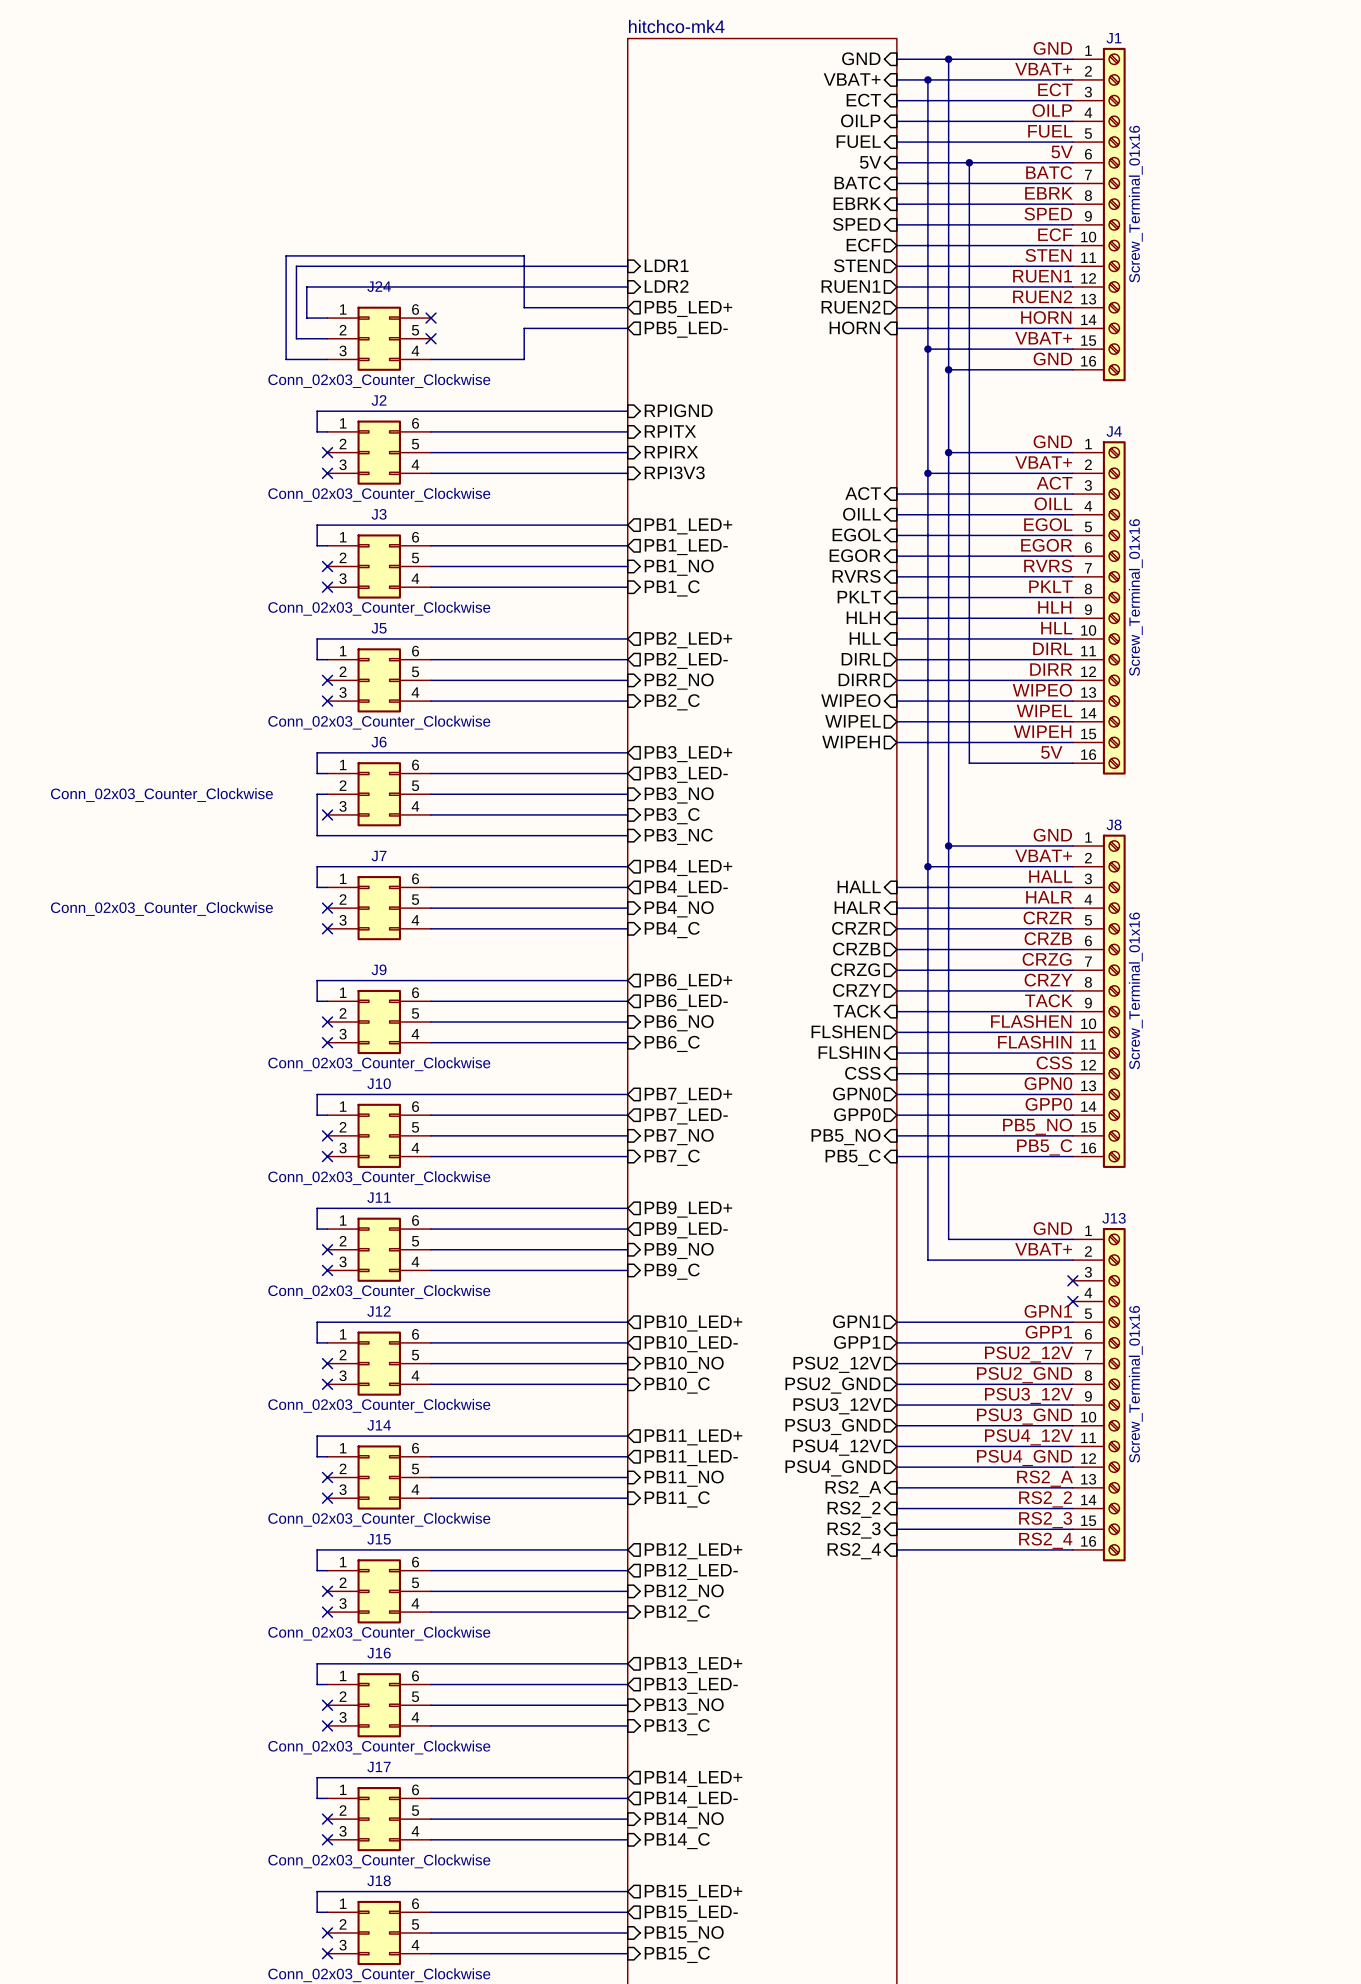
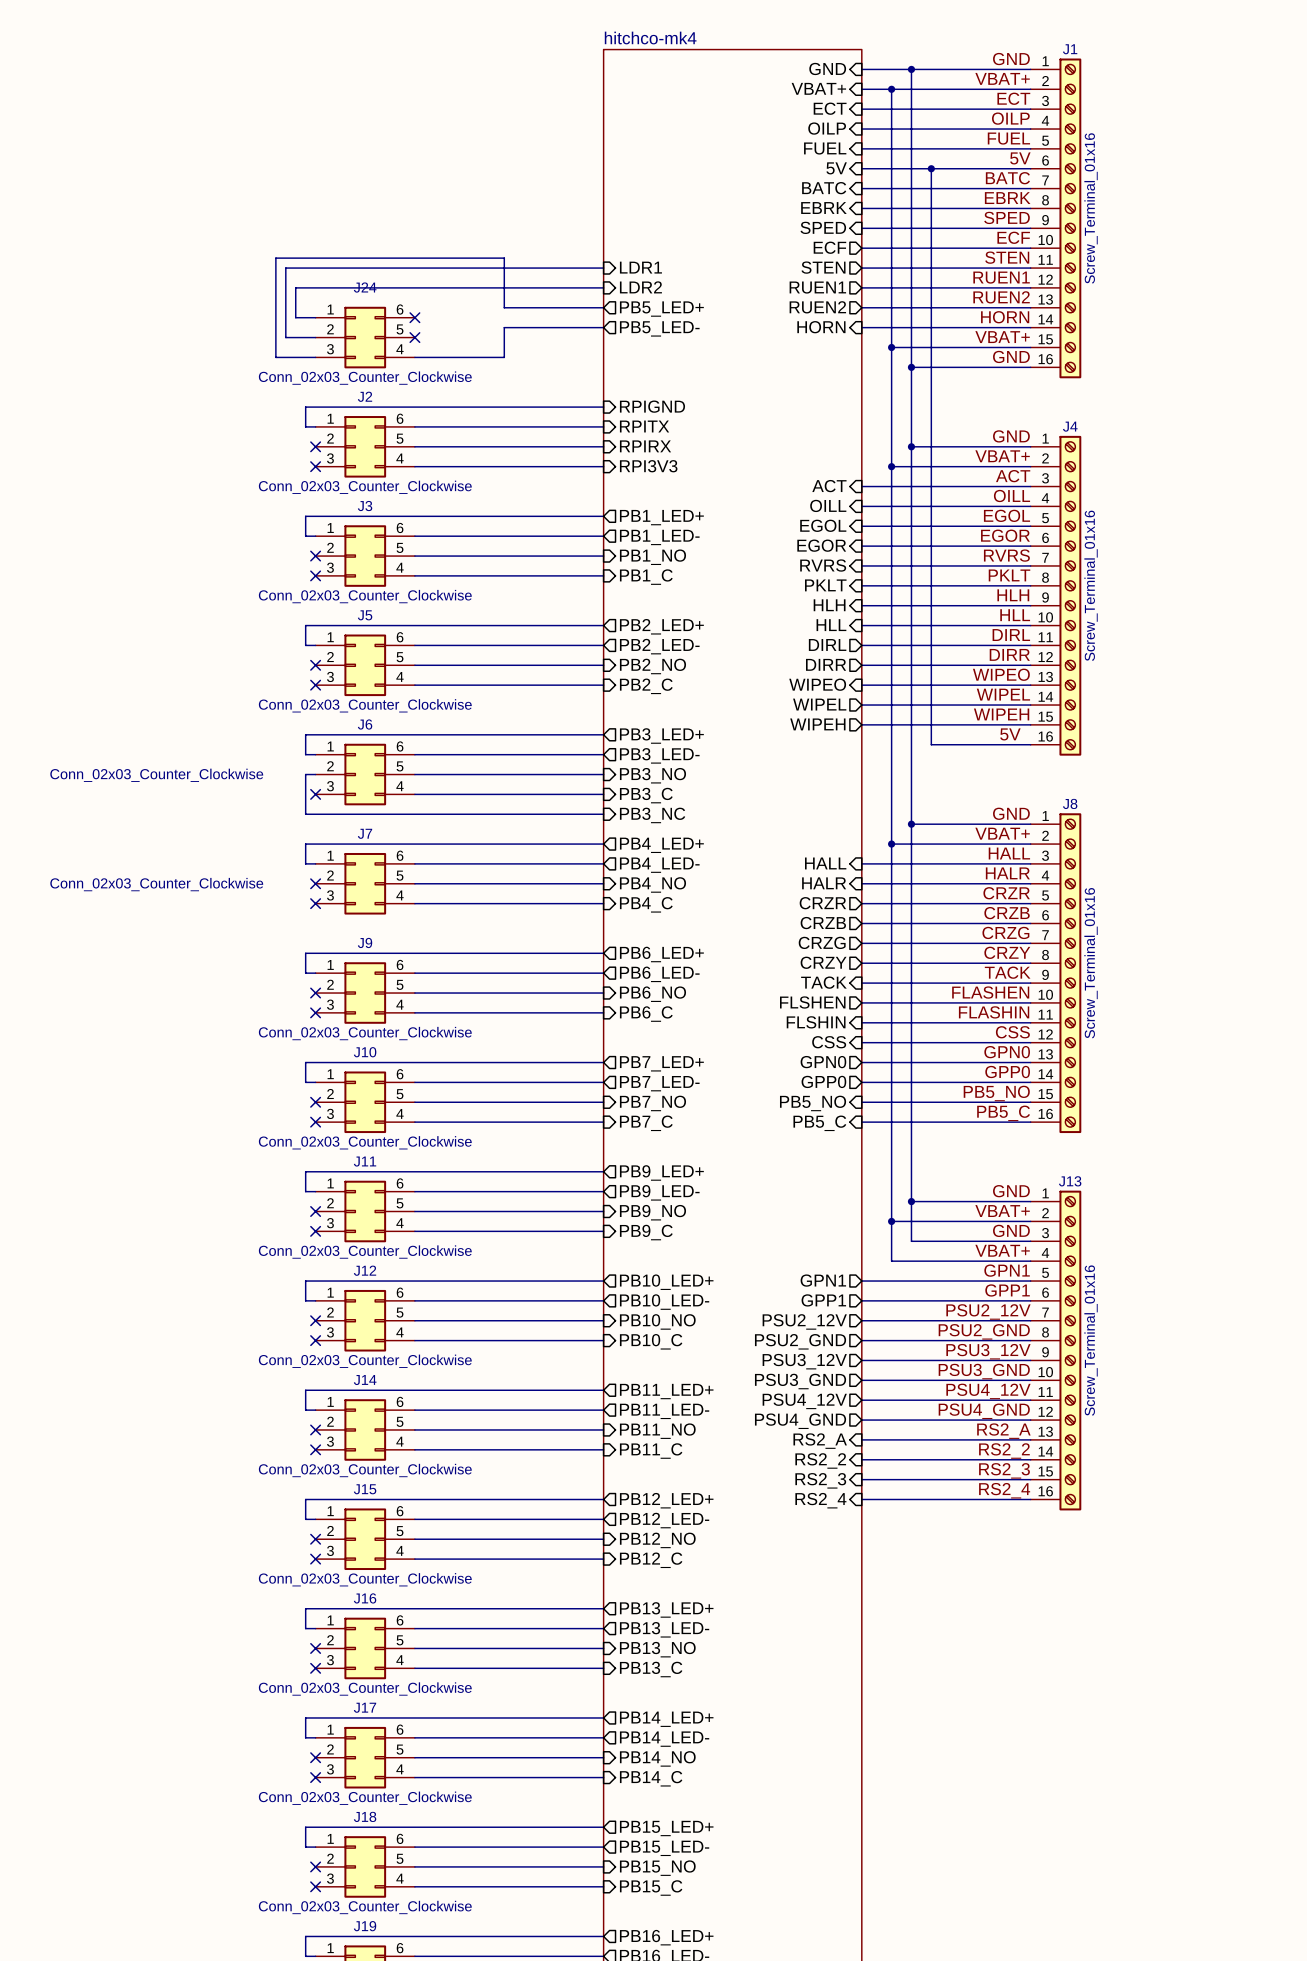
wire: none -> (911, 1201) (911, 1241) (1030, 1241)
junction: none -> (911, 1201)
wire: none -> (891, 1221) (891, 1261) (1030, 1261)
junction: none -> (891, 1221)
label: none -> GND (1011, 1230)
no-connect mark: (1072, 1280) -> none
label: none -> VBAT+ (1002, 1250)
no-connect mark: (1072, 1301) -> none

